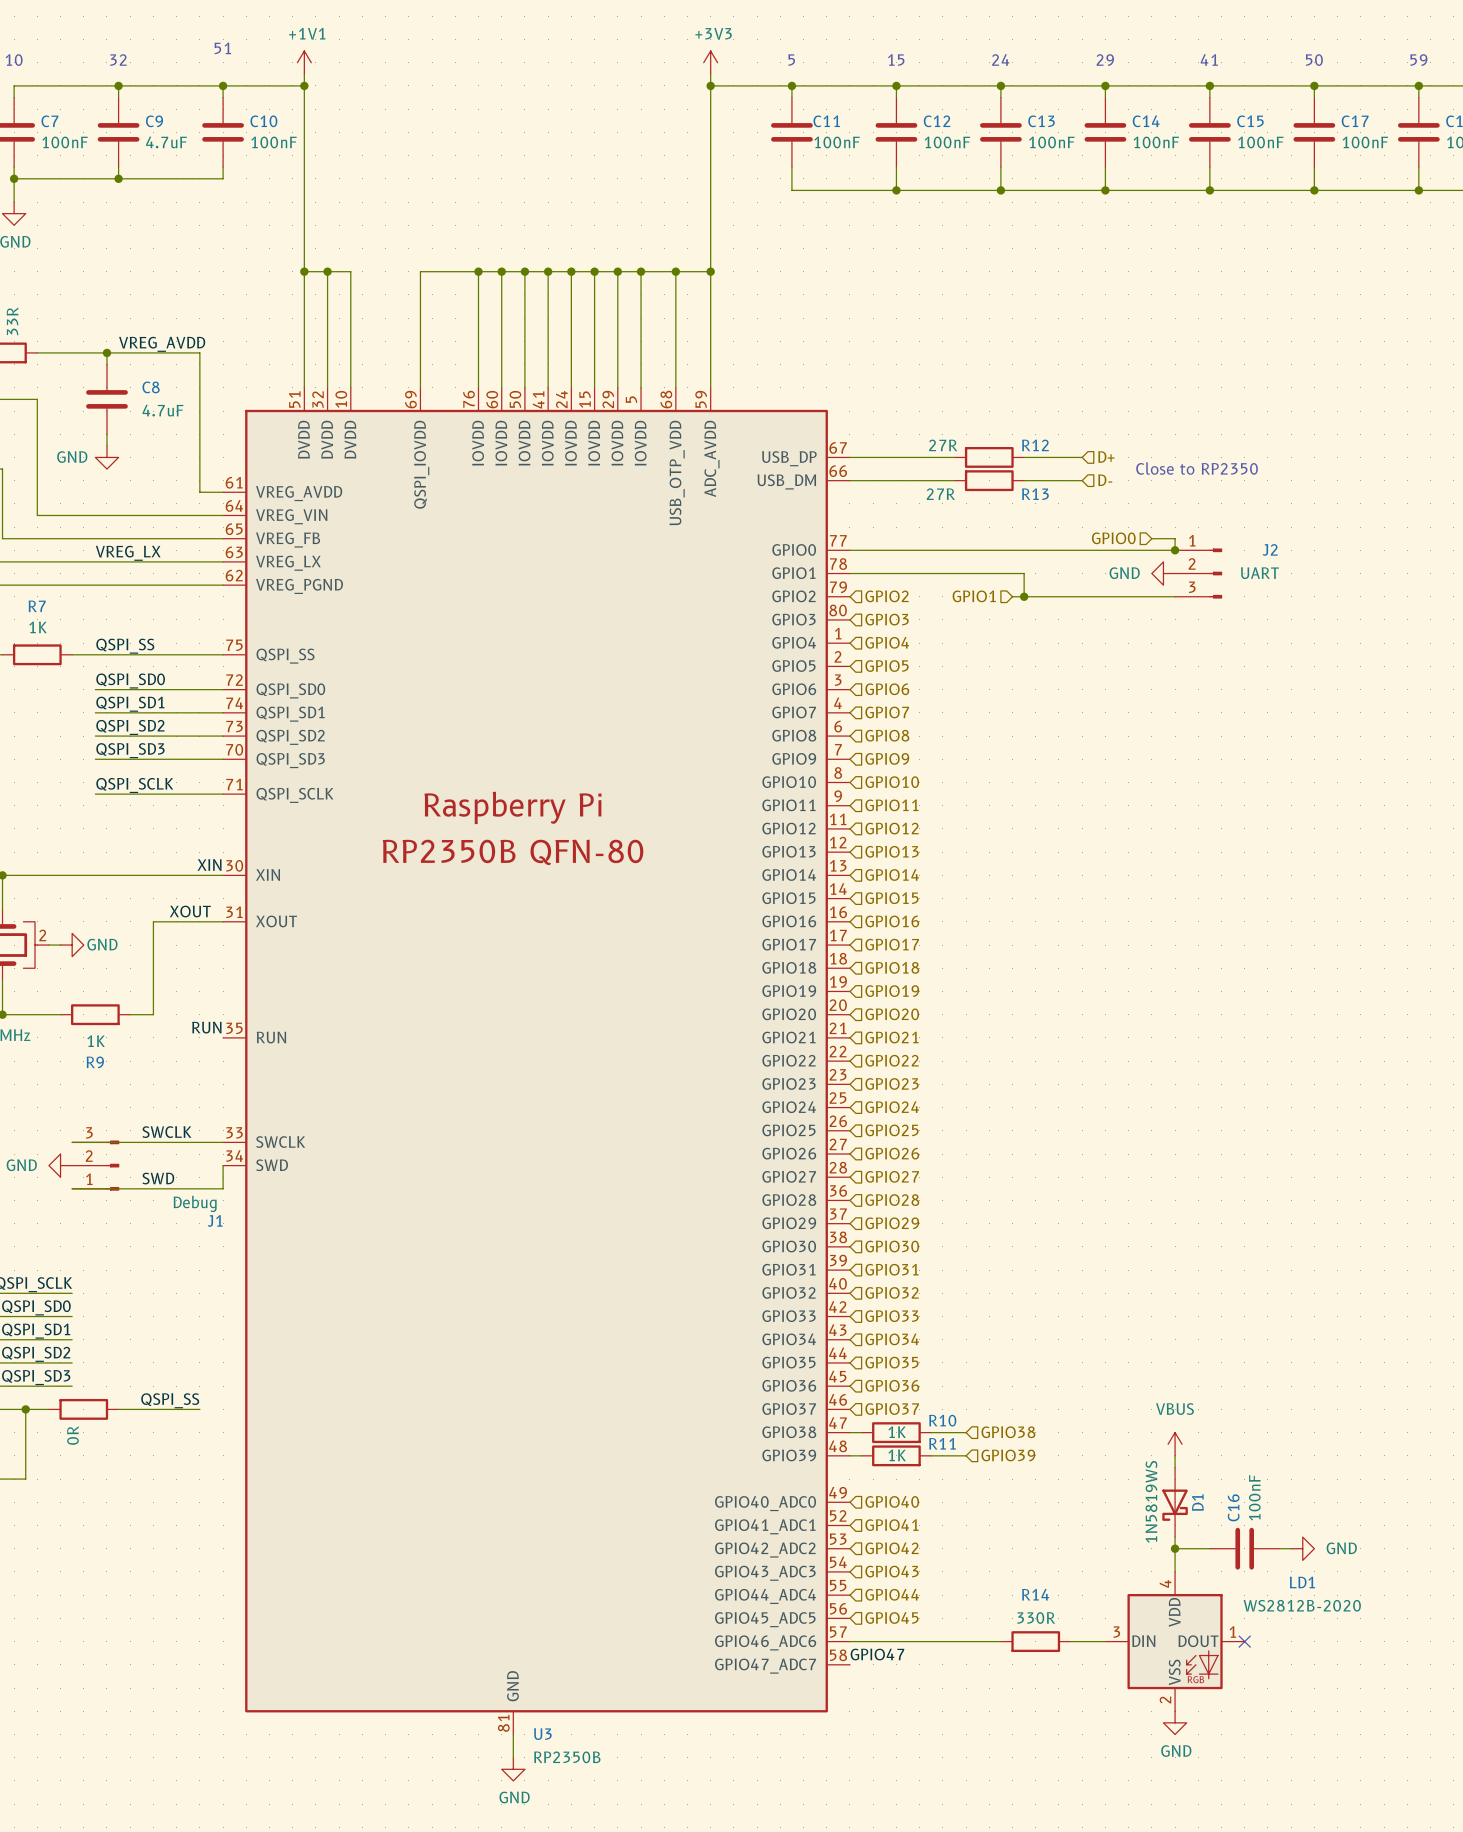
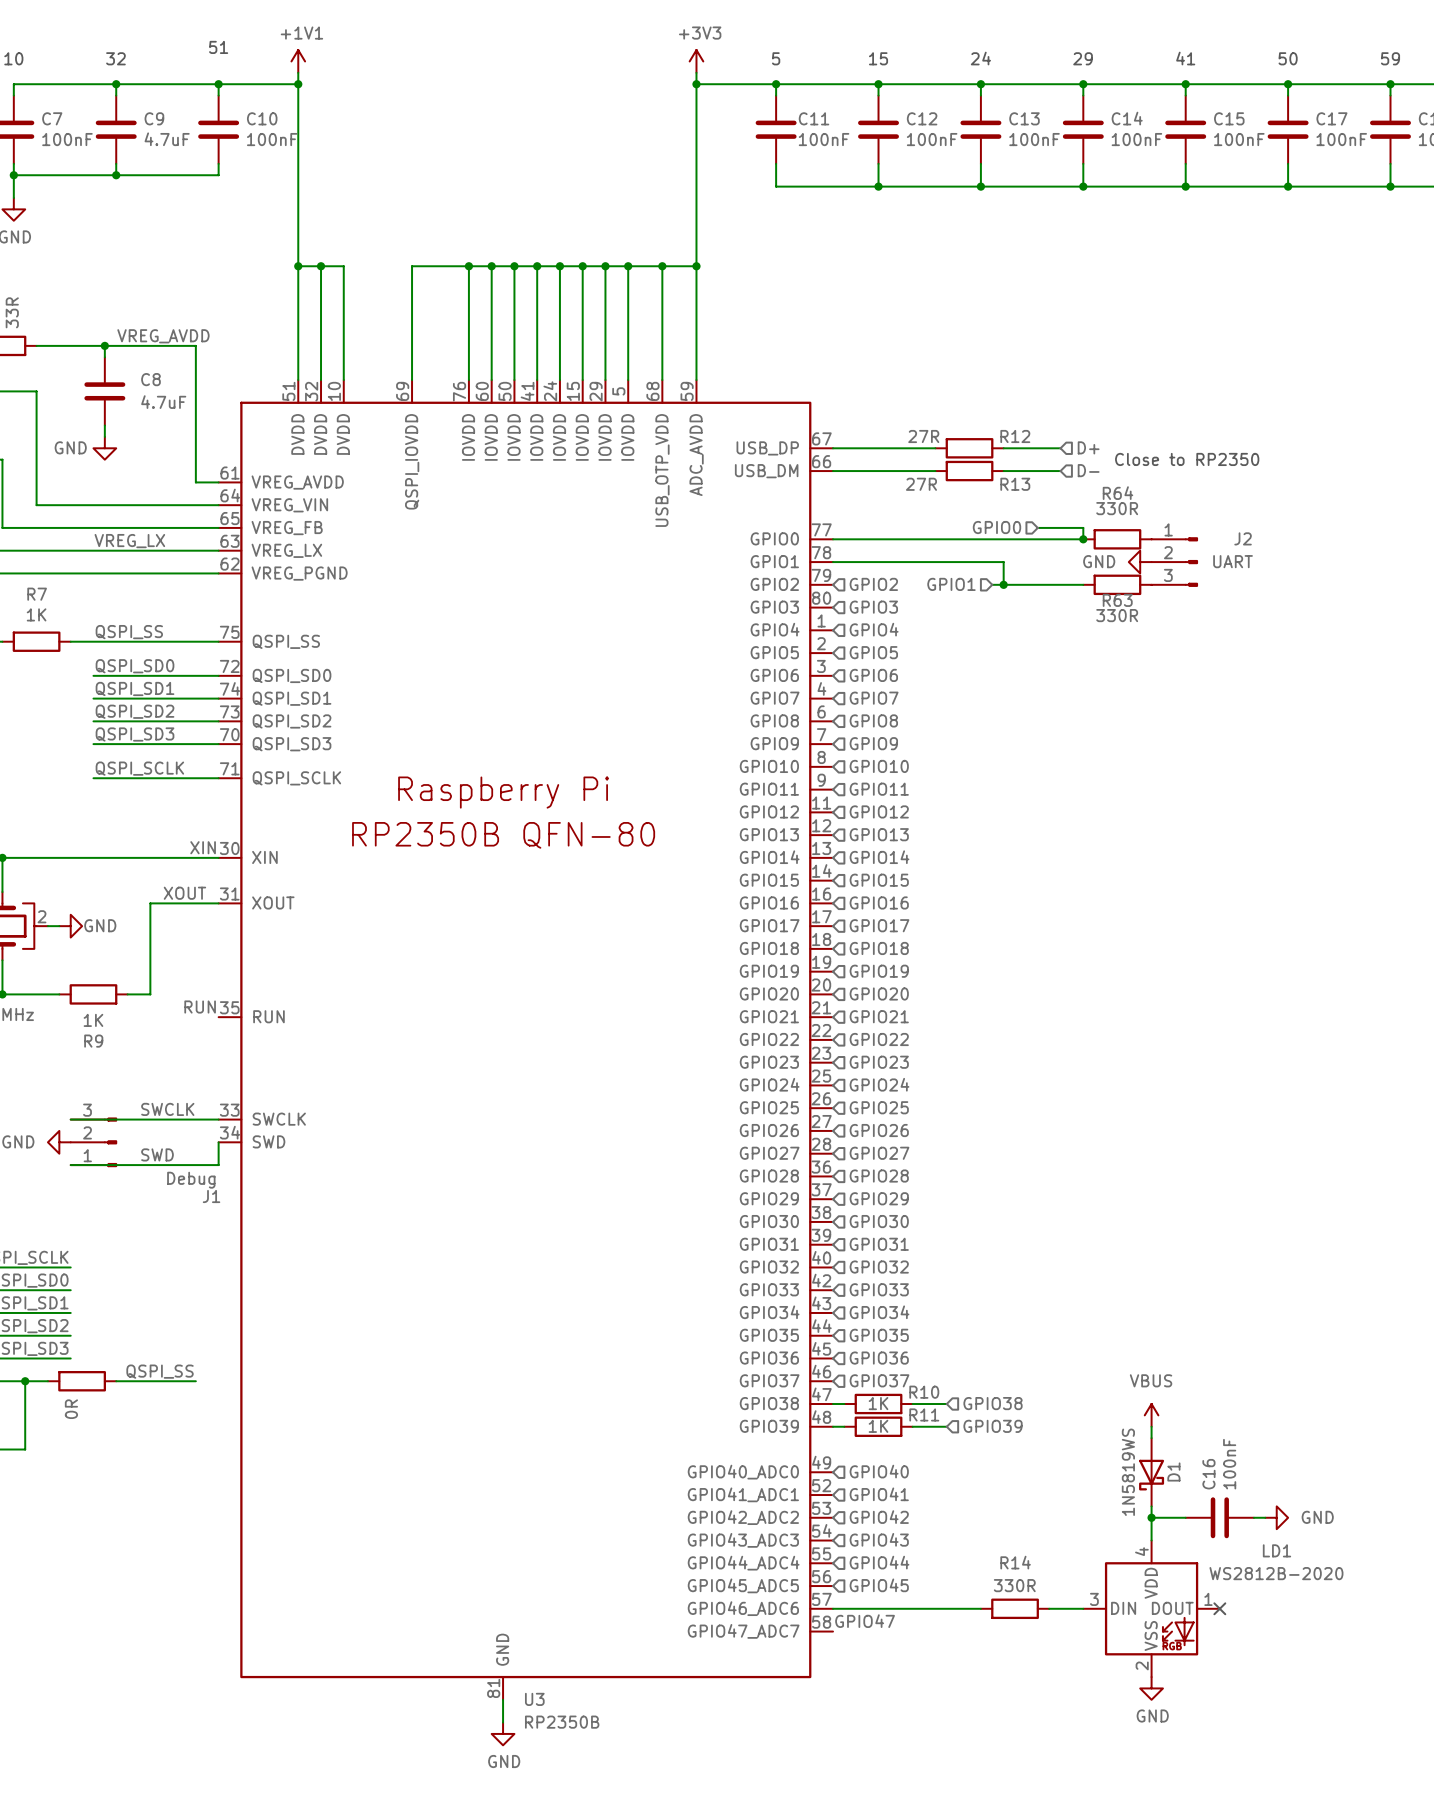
hierarchical label position: GPIO0 (1113, 538) -> GPIO0 (996, 527)
wire: (1151, 538) (1175, 538) (1175, 550) (1105, 550) -> (1037, 527) (1083, 527) (1083, 539)
junction: none -> (1083, 539)
R64: none -> 330R (1117, 539)
junction: (1175, 550) -> none
wire: (1105, 596) (1175, 596) -> none
R63: none -> 330R (1117, 584)

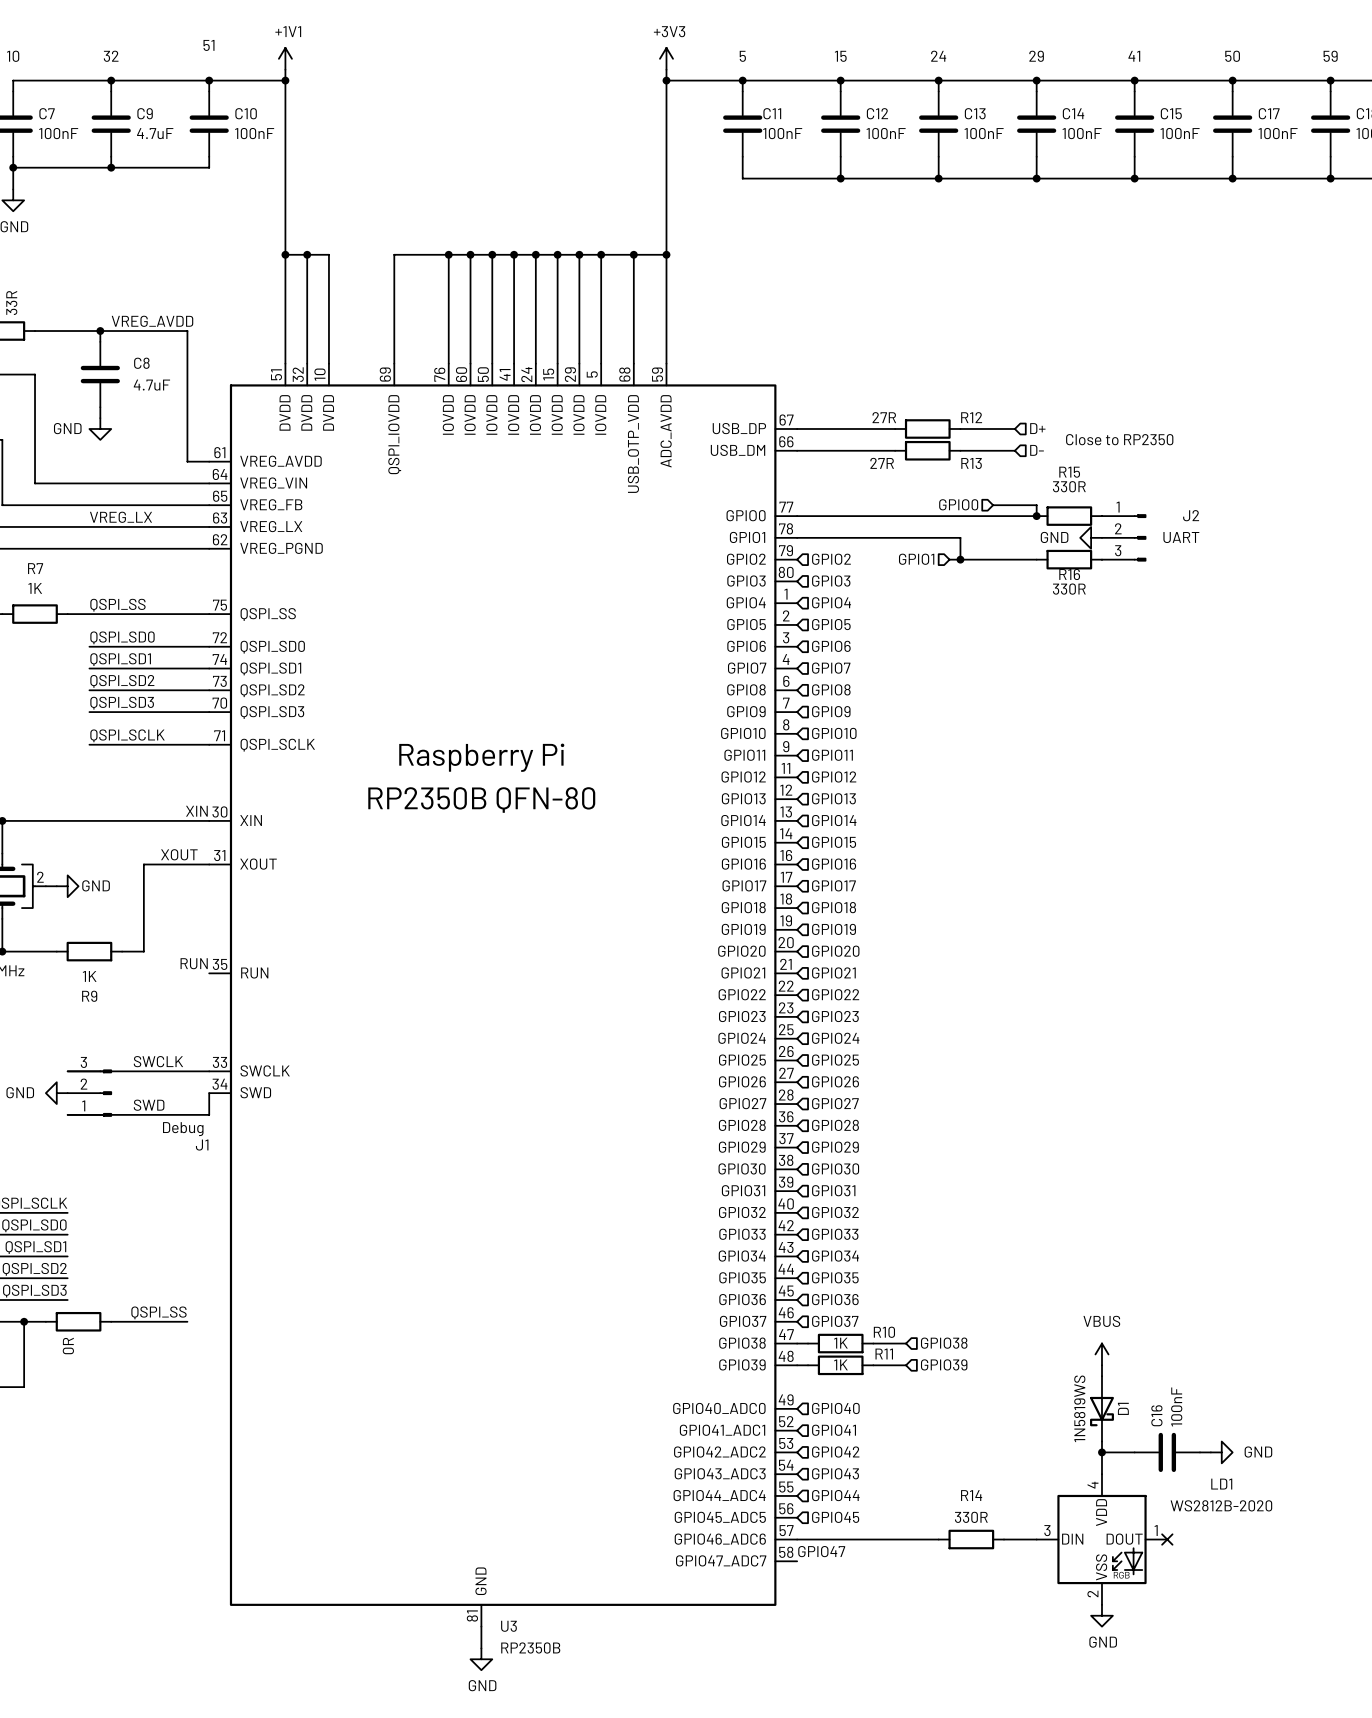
R64 name: R64 (1117, 493) -> R15 (1069, 472)
R63 name: R63 (1117, 600) -> R16 (1069, 574)

